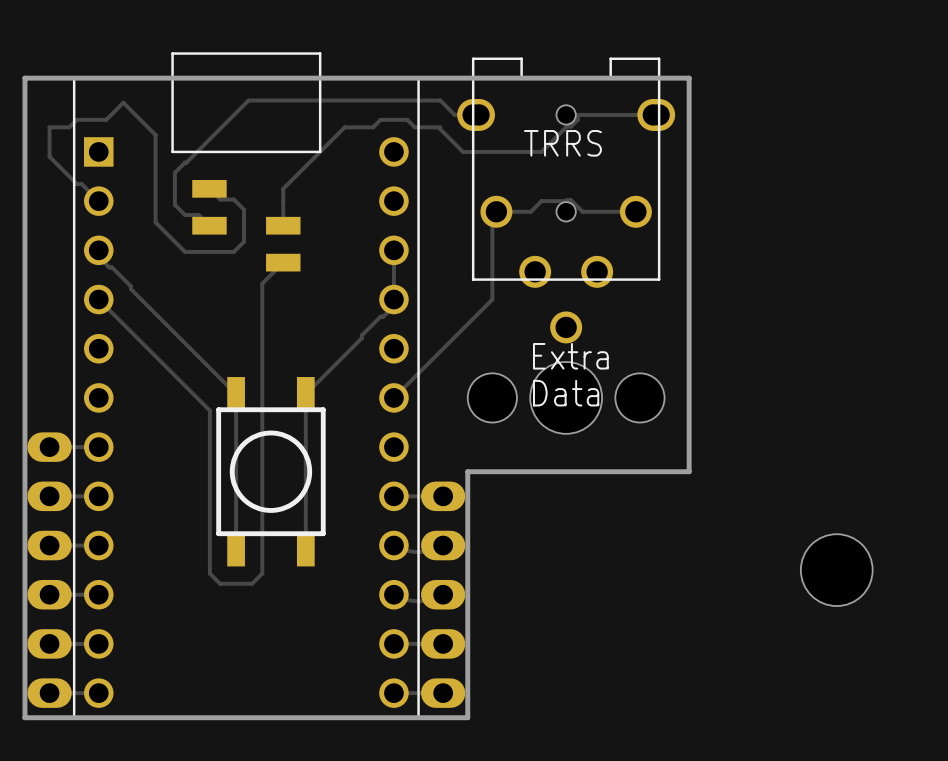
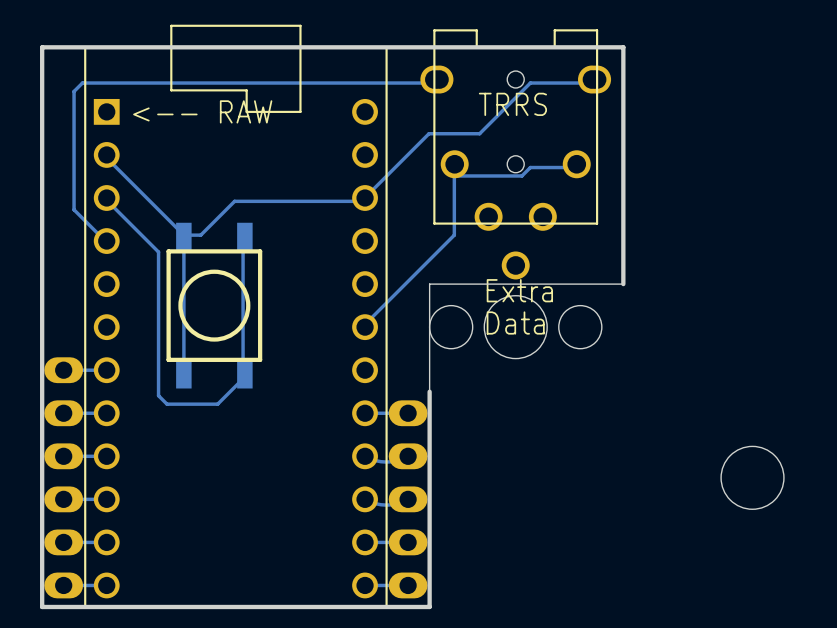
part footprint: [72, 52, 420, 719] -> [84, 24, 388, 609]
track: (473, 114) (454, 114) (440, 100) (248, 100) (174, 172) (174, 204) (185, 215) (198, 215) (209, 225) -> none
track: (653, 114) (578, 114) (577, 119) (570, 126) (566, 126) (541, 151) (463, 151) (439, 127) (414, 127) (407, 119) (380, 119) (373, 127) (344, 127) (283, 188) (283, 225) -> (592, 79) (598, 83) (597, 79) (589, 83) (530, 83) (479, 133) (428, 133) (361, 201) (234, 201) (200, 235) (183, 235)
track: (209, 188) (220, 199) (233, 199) (244, 209) (244, 241) (233, 251) (185, 251) (155, 222) (155, 134) (123, 102) (106, 119) (76, 119) (69, 127) (49, 127) (49, 156) (76, 184) (81, 184) (98, 201) -> (183, 235) (107, 159) (106, 154)
track: (566, 200) (570, 200) (582, 211) (635, 211) -> none
track: (566, 201) (541, 201) (530, 211) (496, 211) (492, 215) (492, 299) (393, 397) -> (576, 164) (572, 167) (530, 167) (521, 175) (454, 175) (454, 164) (454, 167) (454, 235) (369, 319) (365, 327)
part: (246, 225) -> none
track: (98, 250) (98, 256) (130, 286) (130, 289) (236, 394) (236, 549) -> (106, 197) (107, 201) (158, 252) (158, 395) (167, 404) (217, 404) (243, 378) (244, 373) (243, 370) (243, 243) (244, 237)
track: (393, 250) (393, 306) (383, 316) (380, 316) (305, 394) (305, 549) -> none
track: (283, 262) (262, 283) (262, 573) (252, 583) (220, 583) (209, 573) (209, 410) (98, 299) -> (439, 79) (437, 83) (434, 79) (428, 83) (82, 83) (74, 91) (74, 209) (106, 241)
track: none -> (183, 235) (183, 373)
board edge: (689, 348) (689, 471) (467, 471) -> (623, 284) (429, 284) (429, 391)
part position: (270, 471) -> (214, 305)

